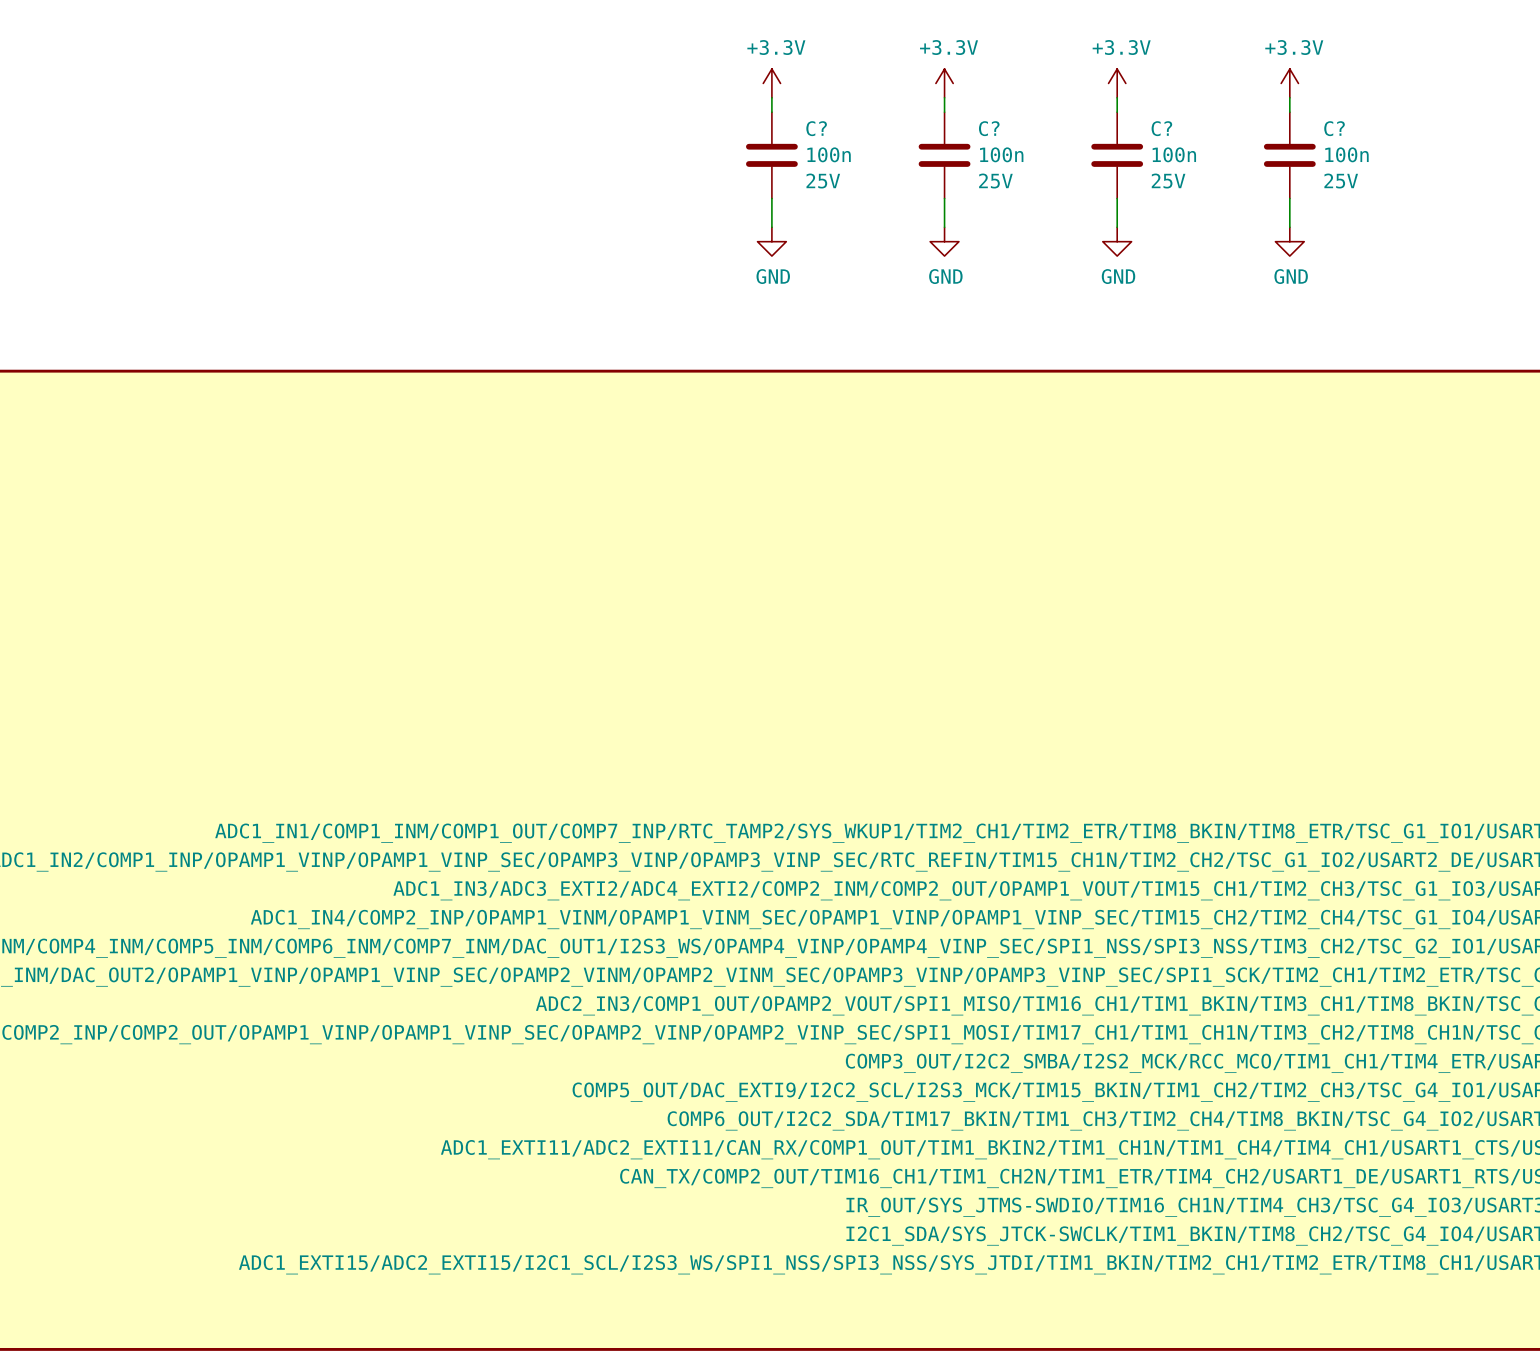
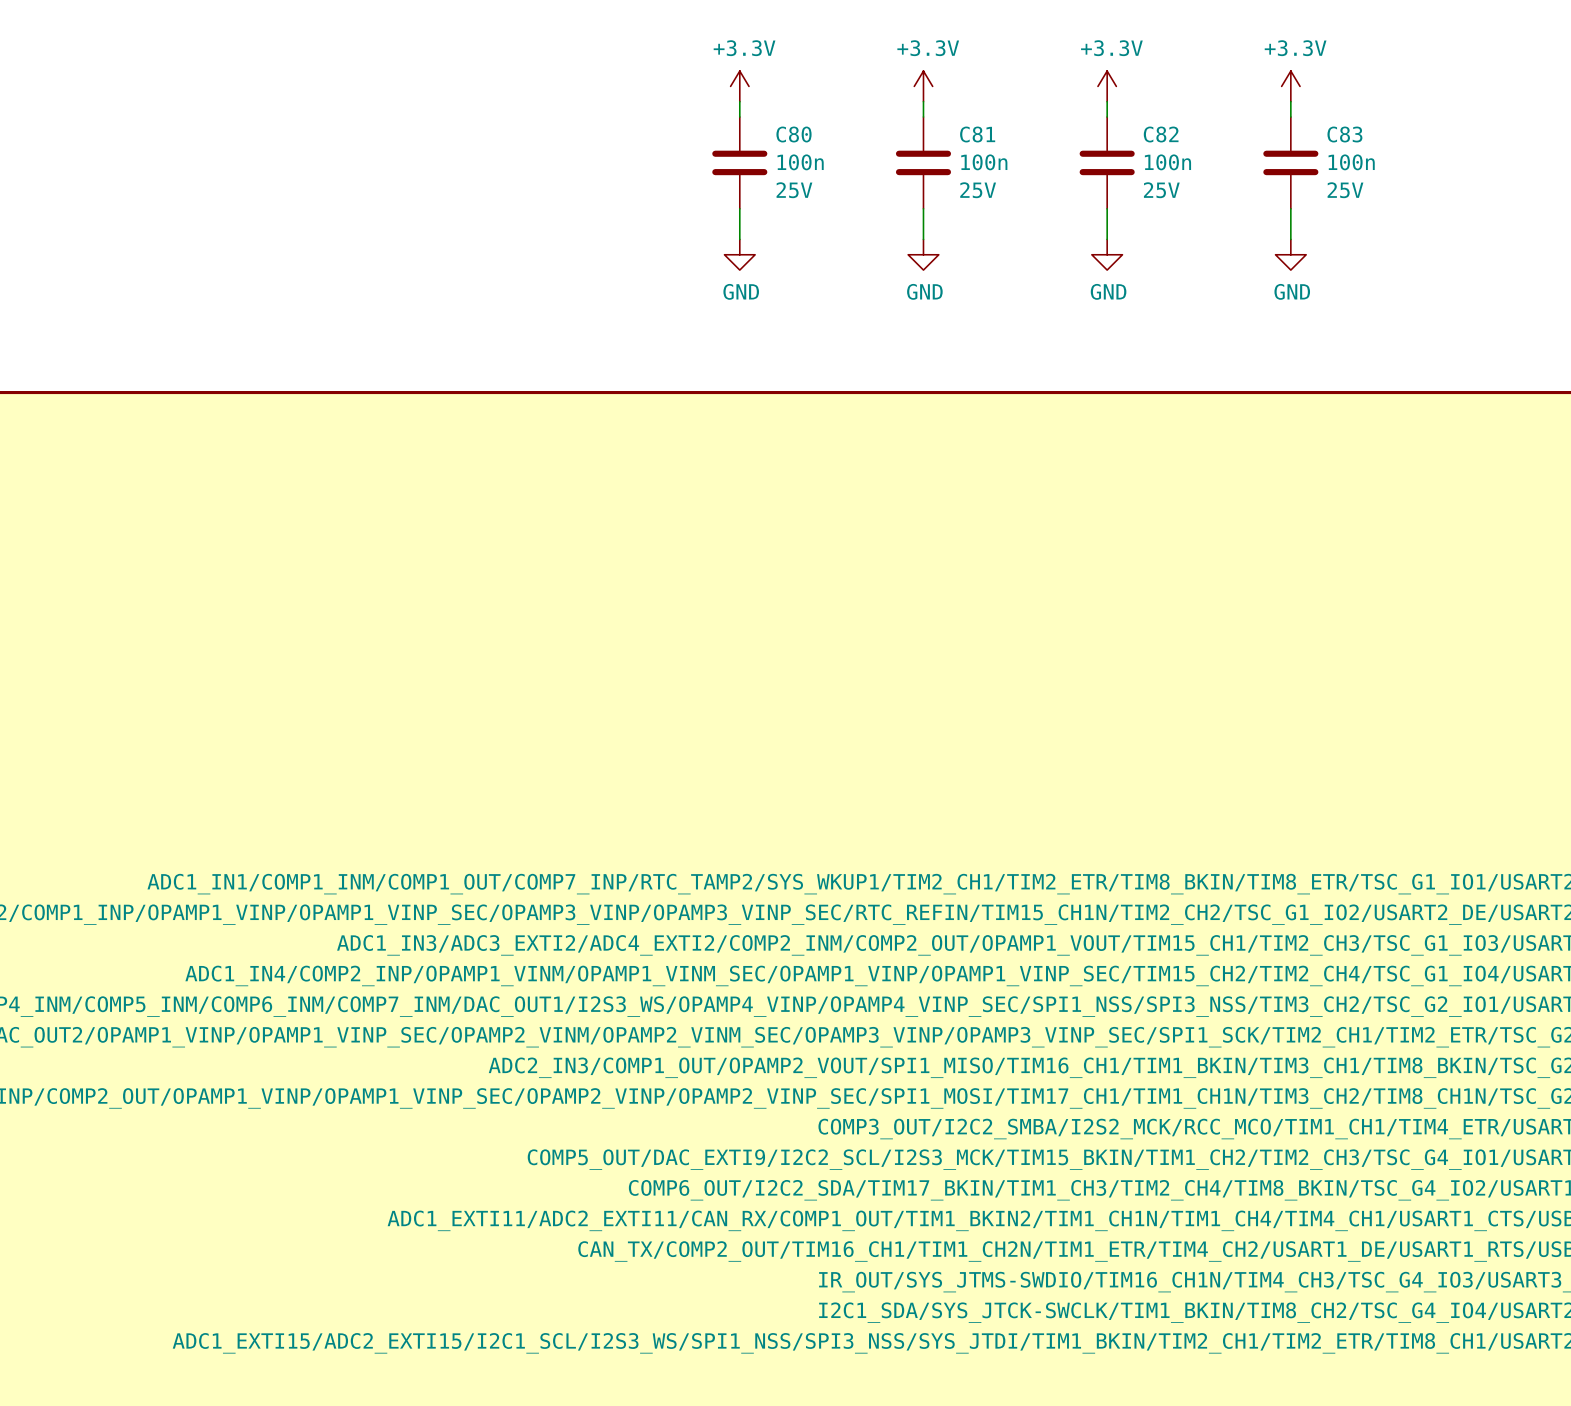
C? name: C? (816, 128) -> C80 (793, 134)
C? name: C? (989, 128) -> C81 (977, 134)
C? name: C? (1161, 128) -> C82 (1161, 134)
C? name: C? (1334, 128) -> C83 (1344, 134)

